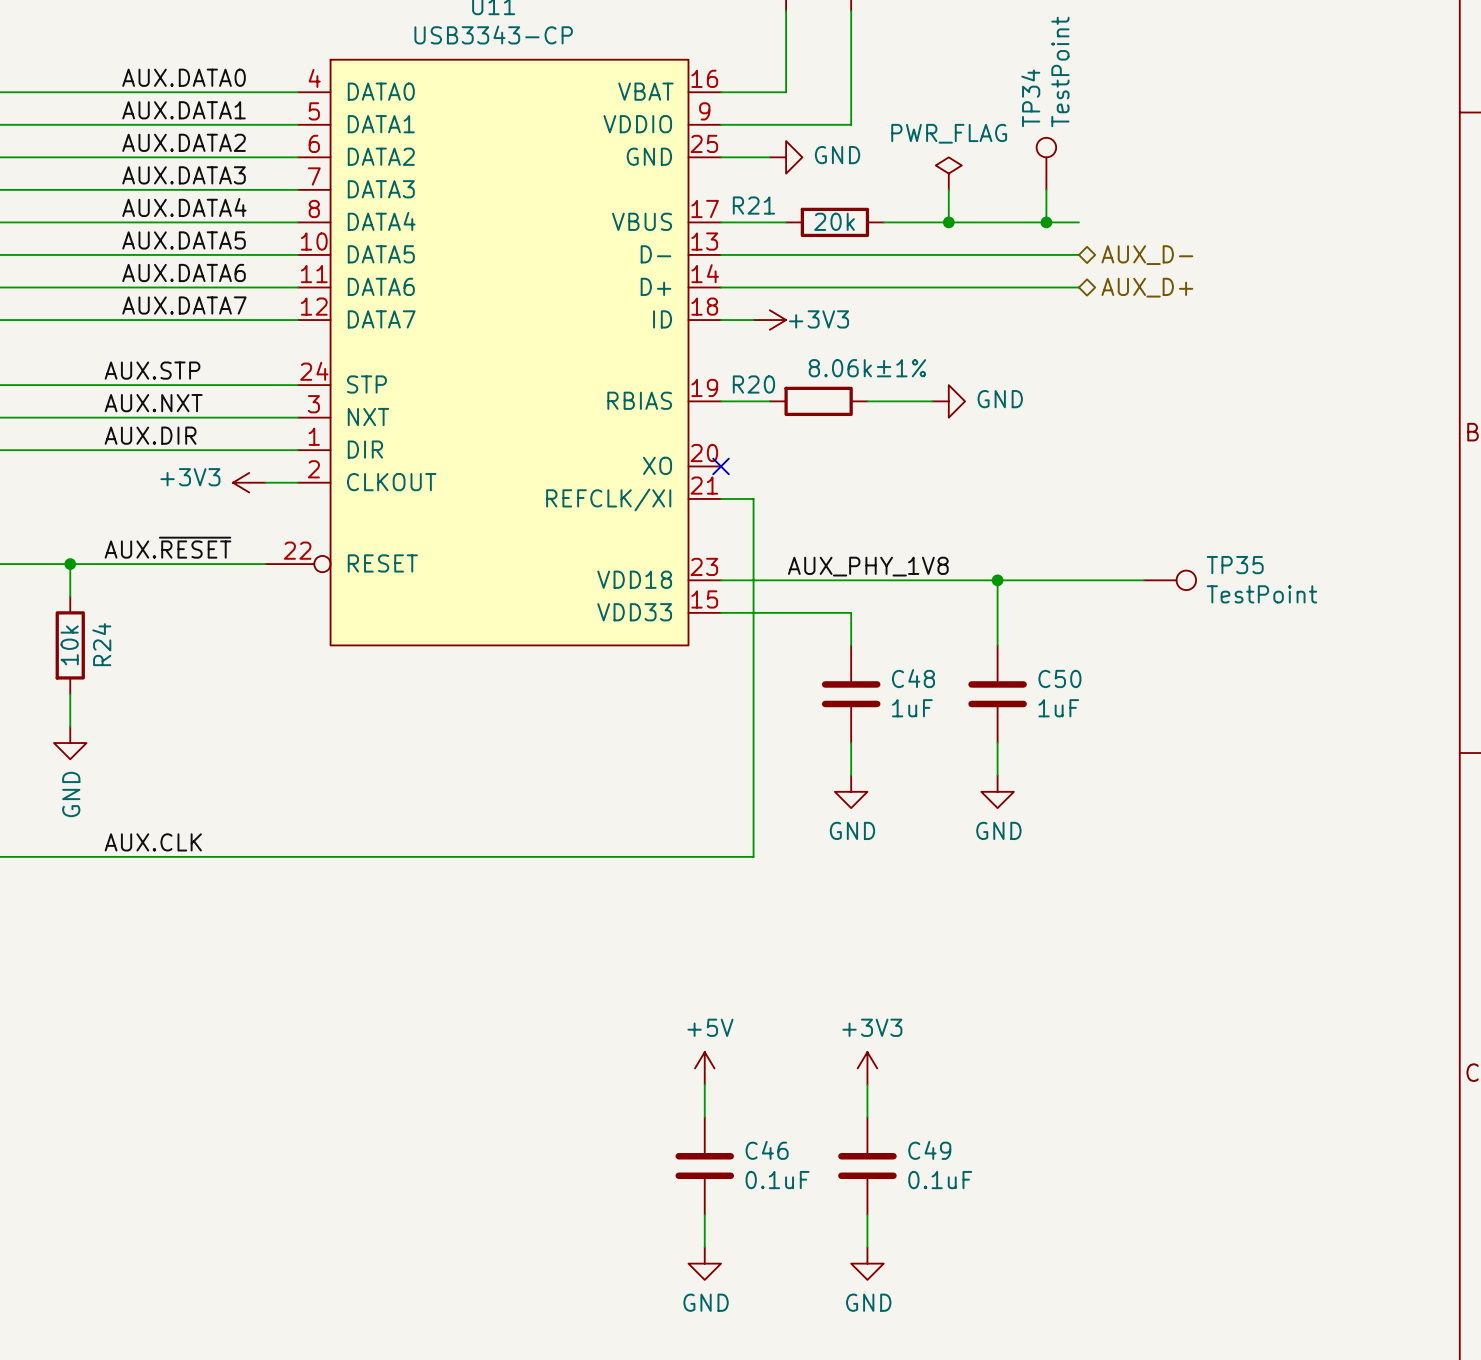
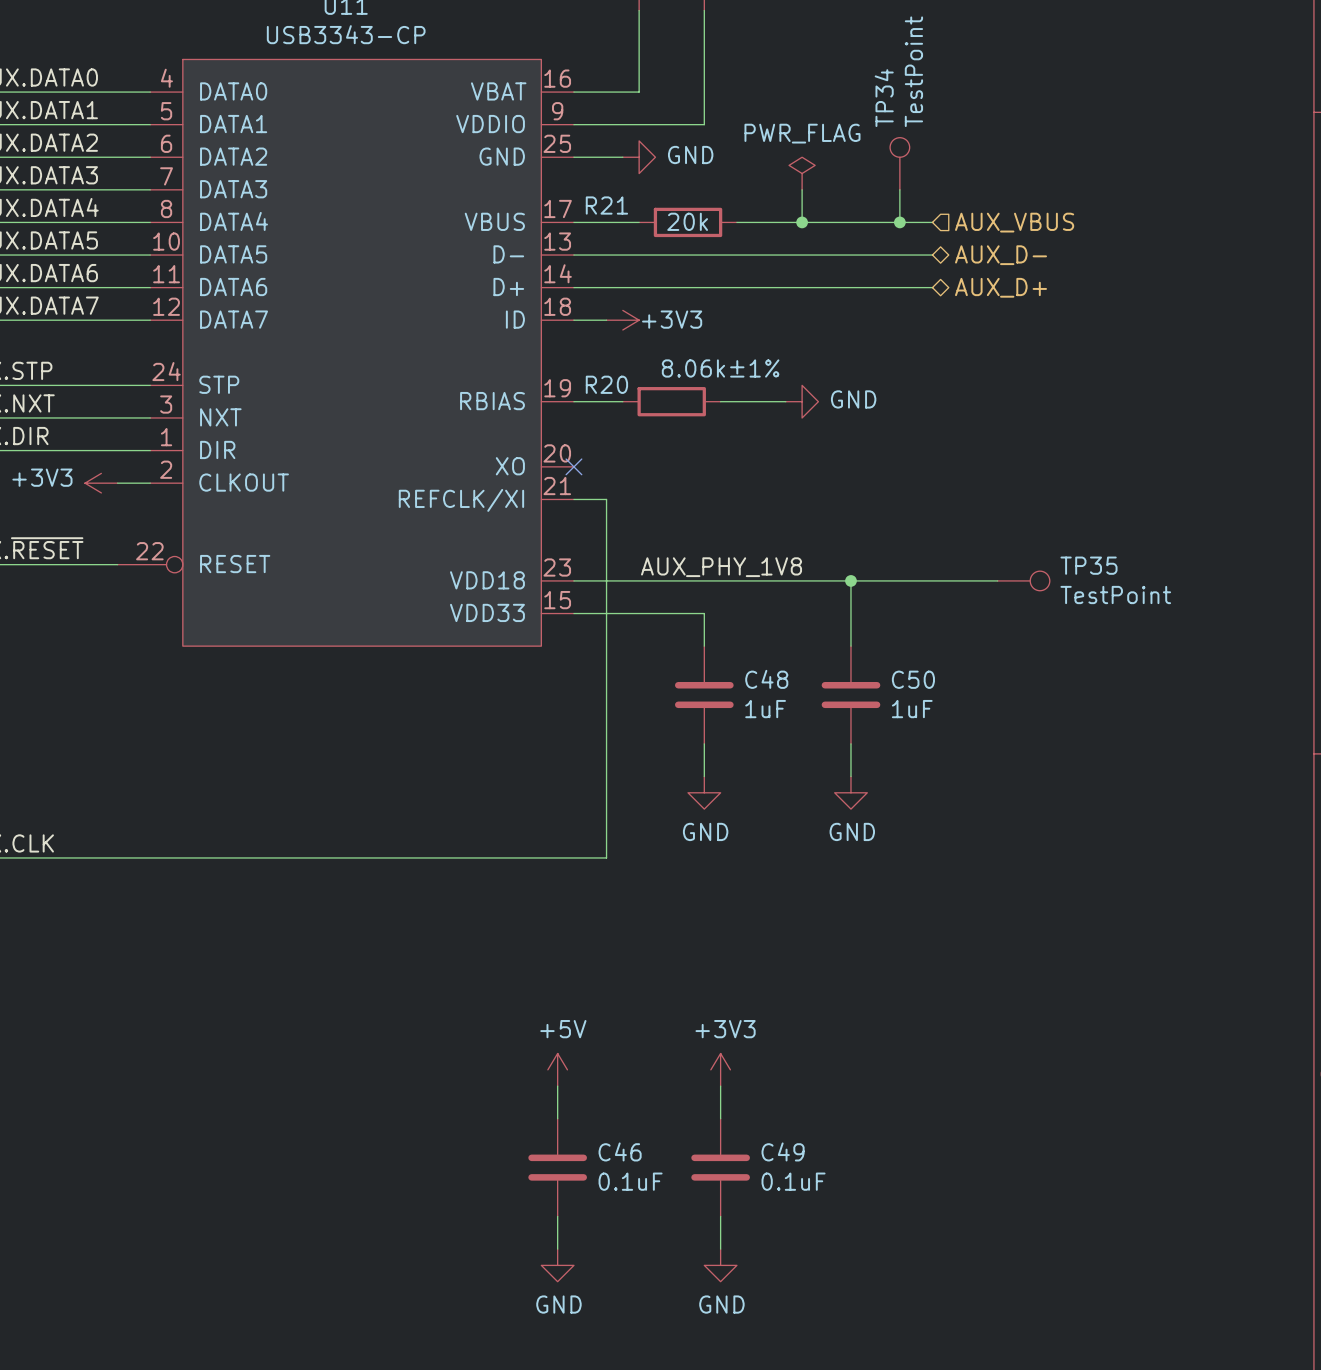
hierarchical label: none -> AUX_VBUS (1014, 222)

